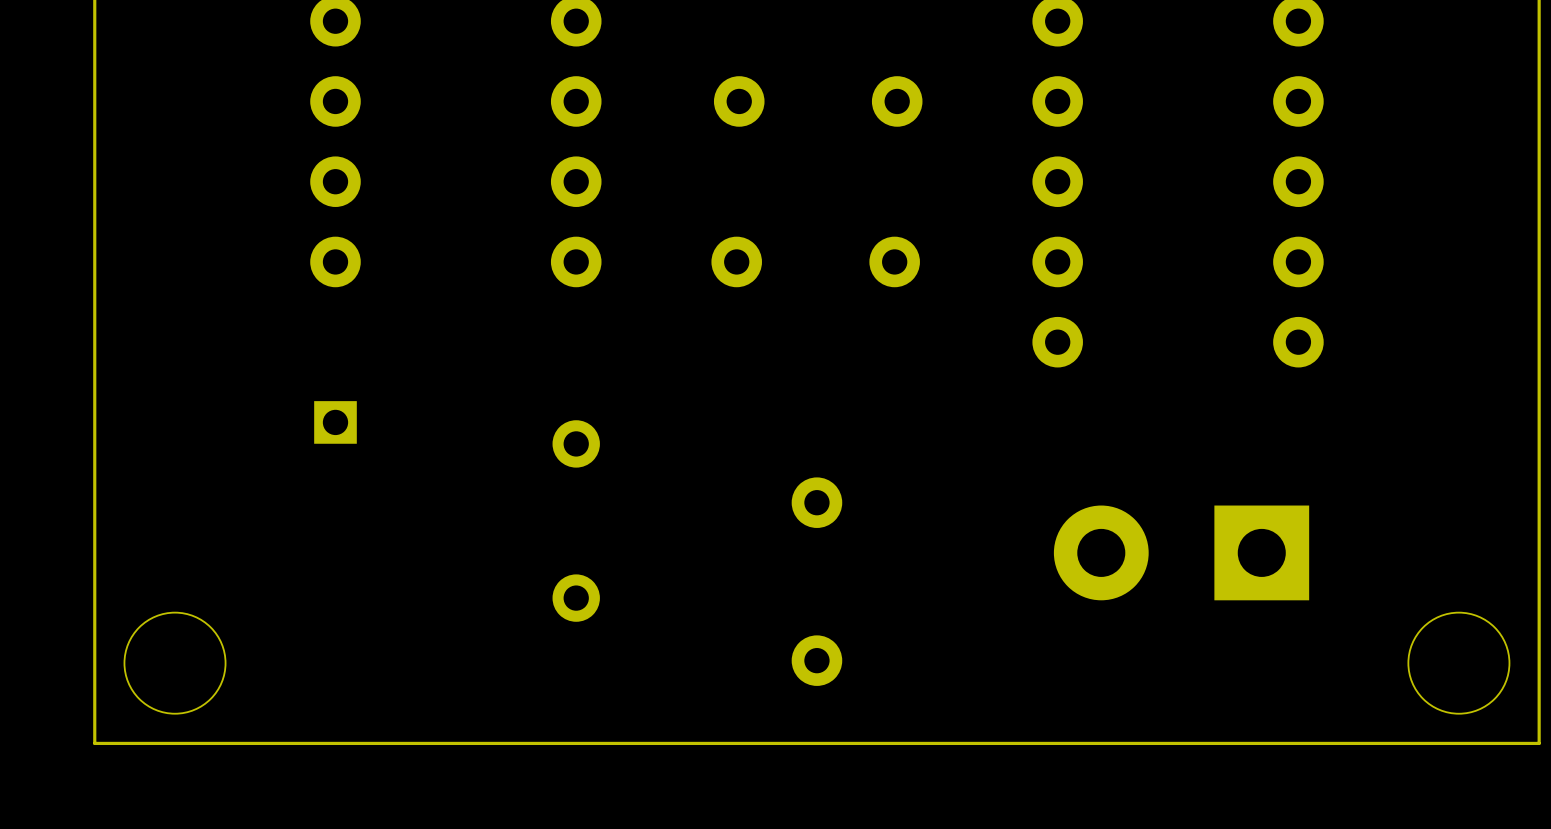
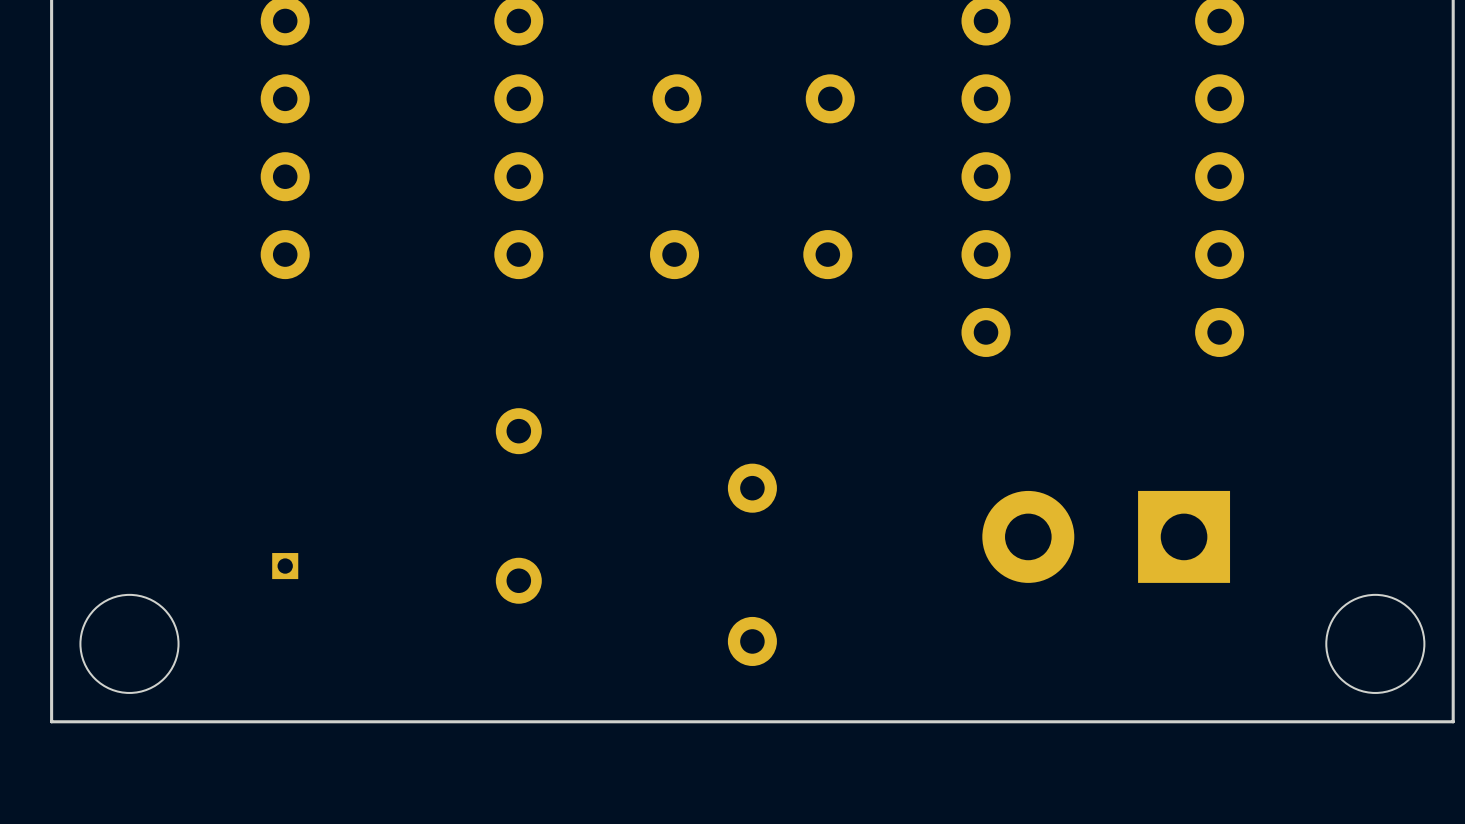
part: (335, 422) -> none
part: none -> (285, 566)

